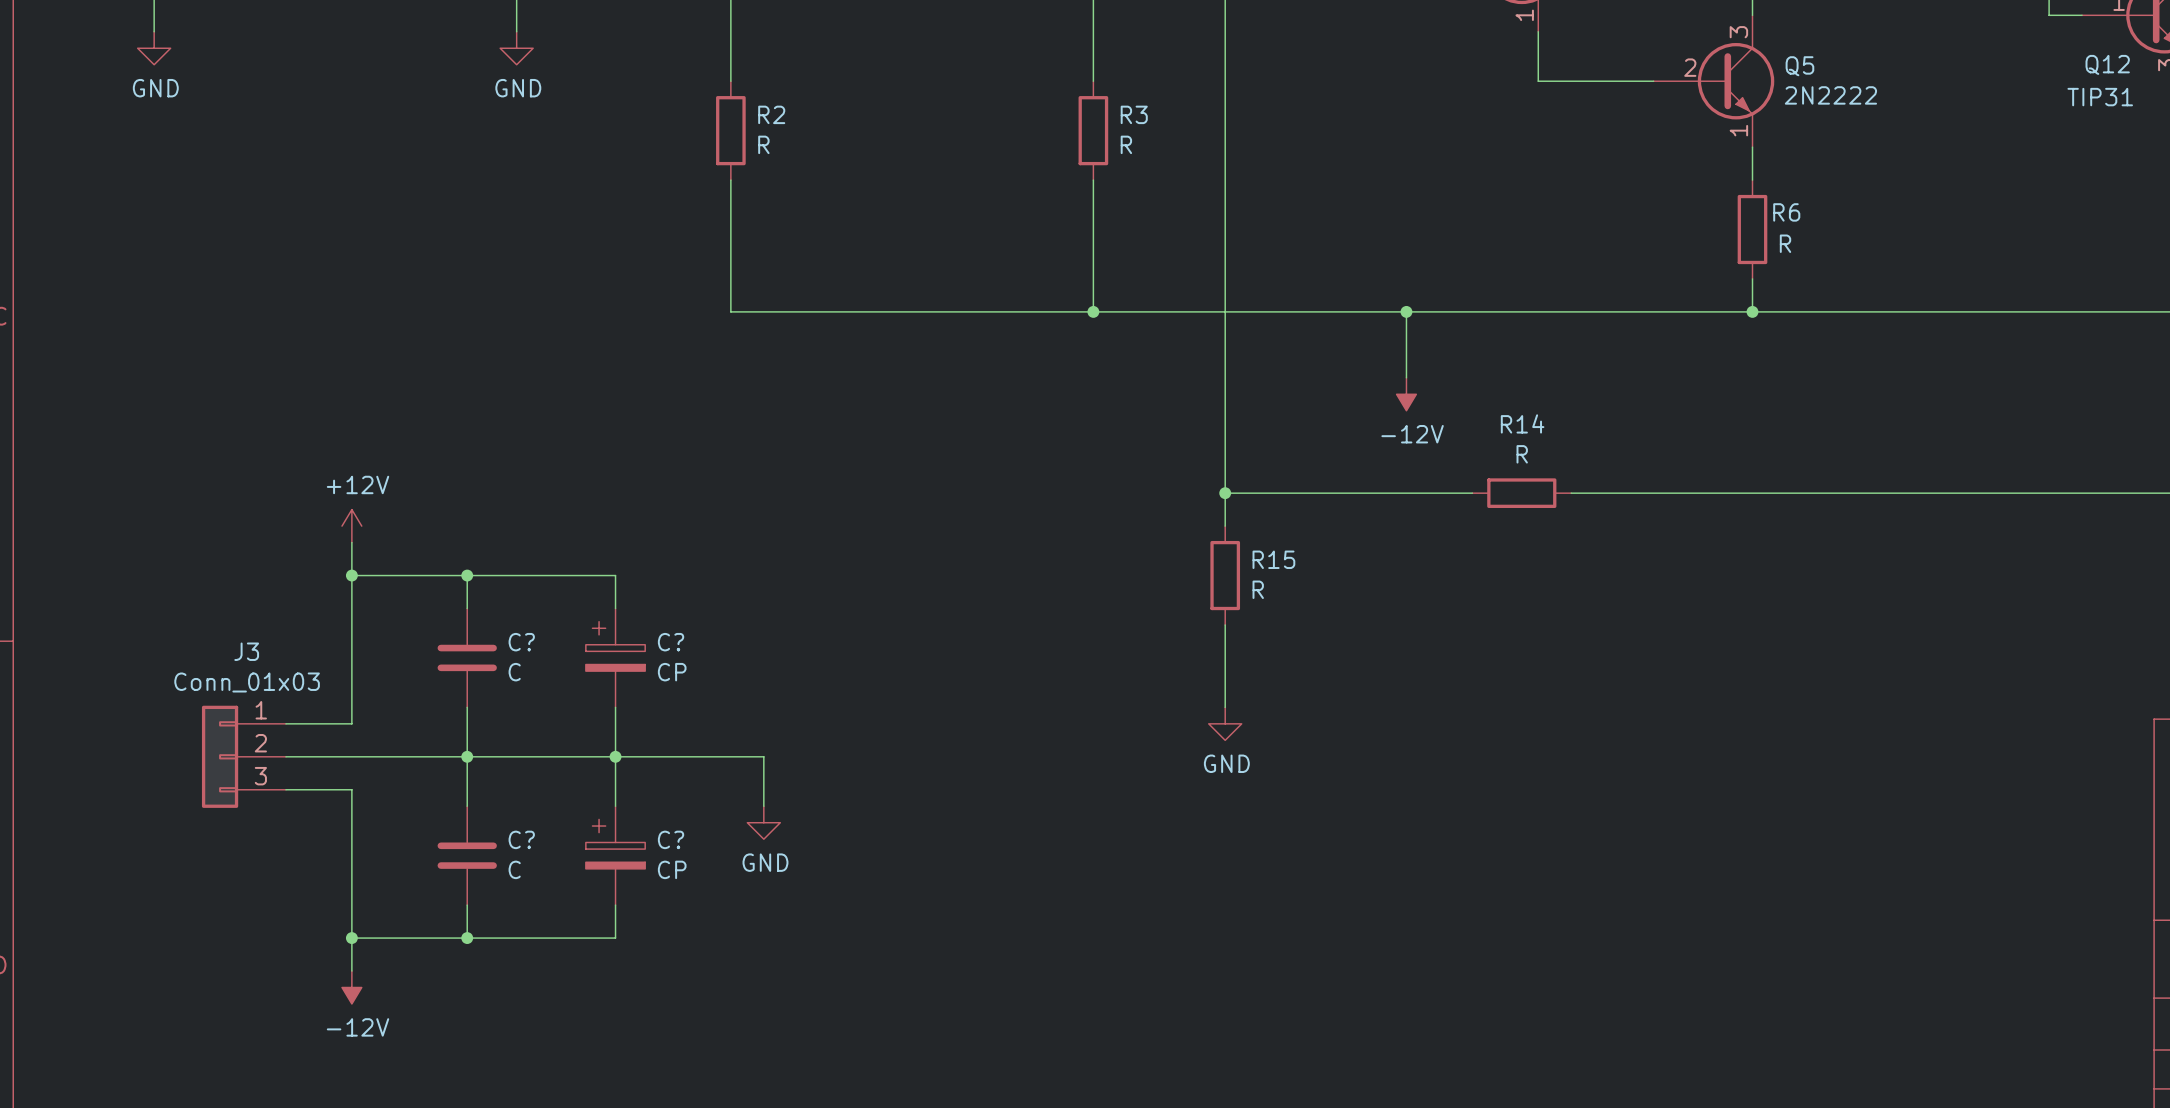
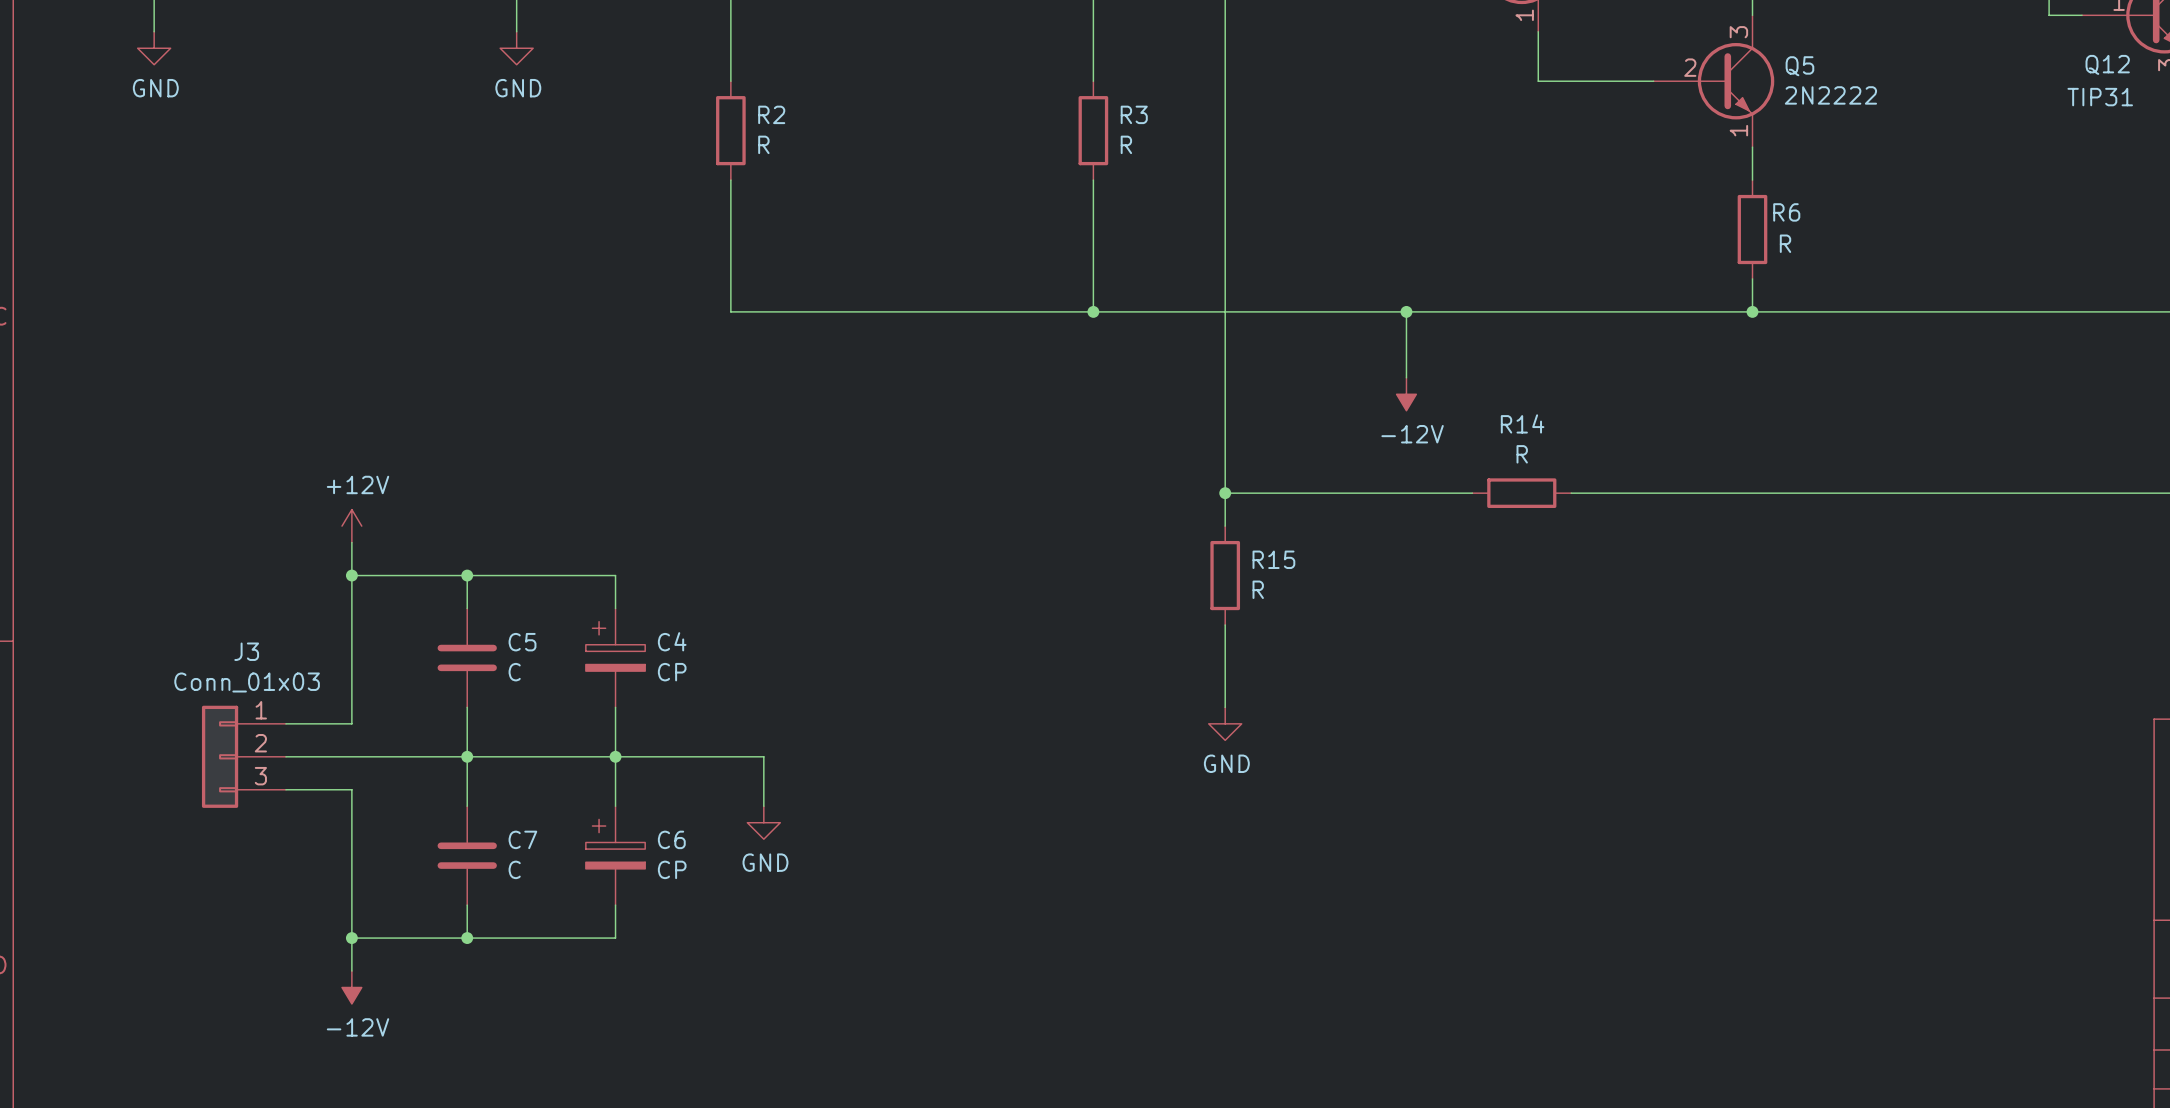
C? name: C? (521, 642) -> C5 (522, 642)
C? name: C? (671, 642) -> C4 (672, 641)
C? name: C? (521, 839) -> C7 (522, 839)
C? name: C? (671, 839) -> C6 (671, 839)

